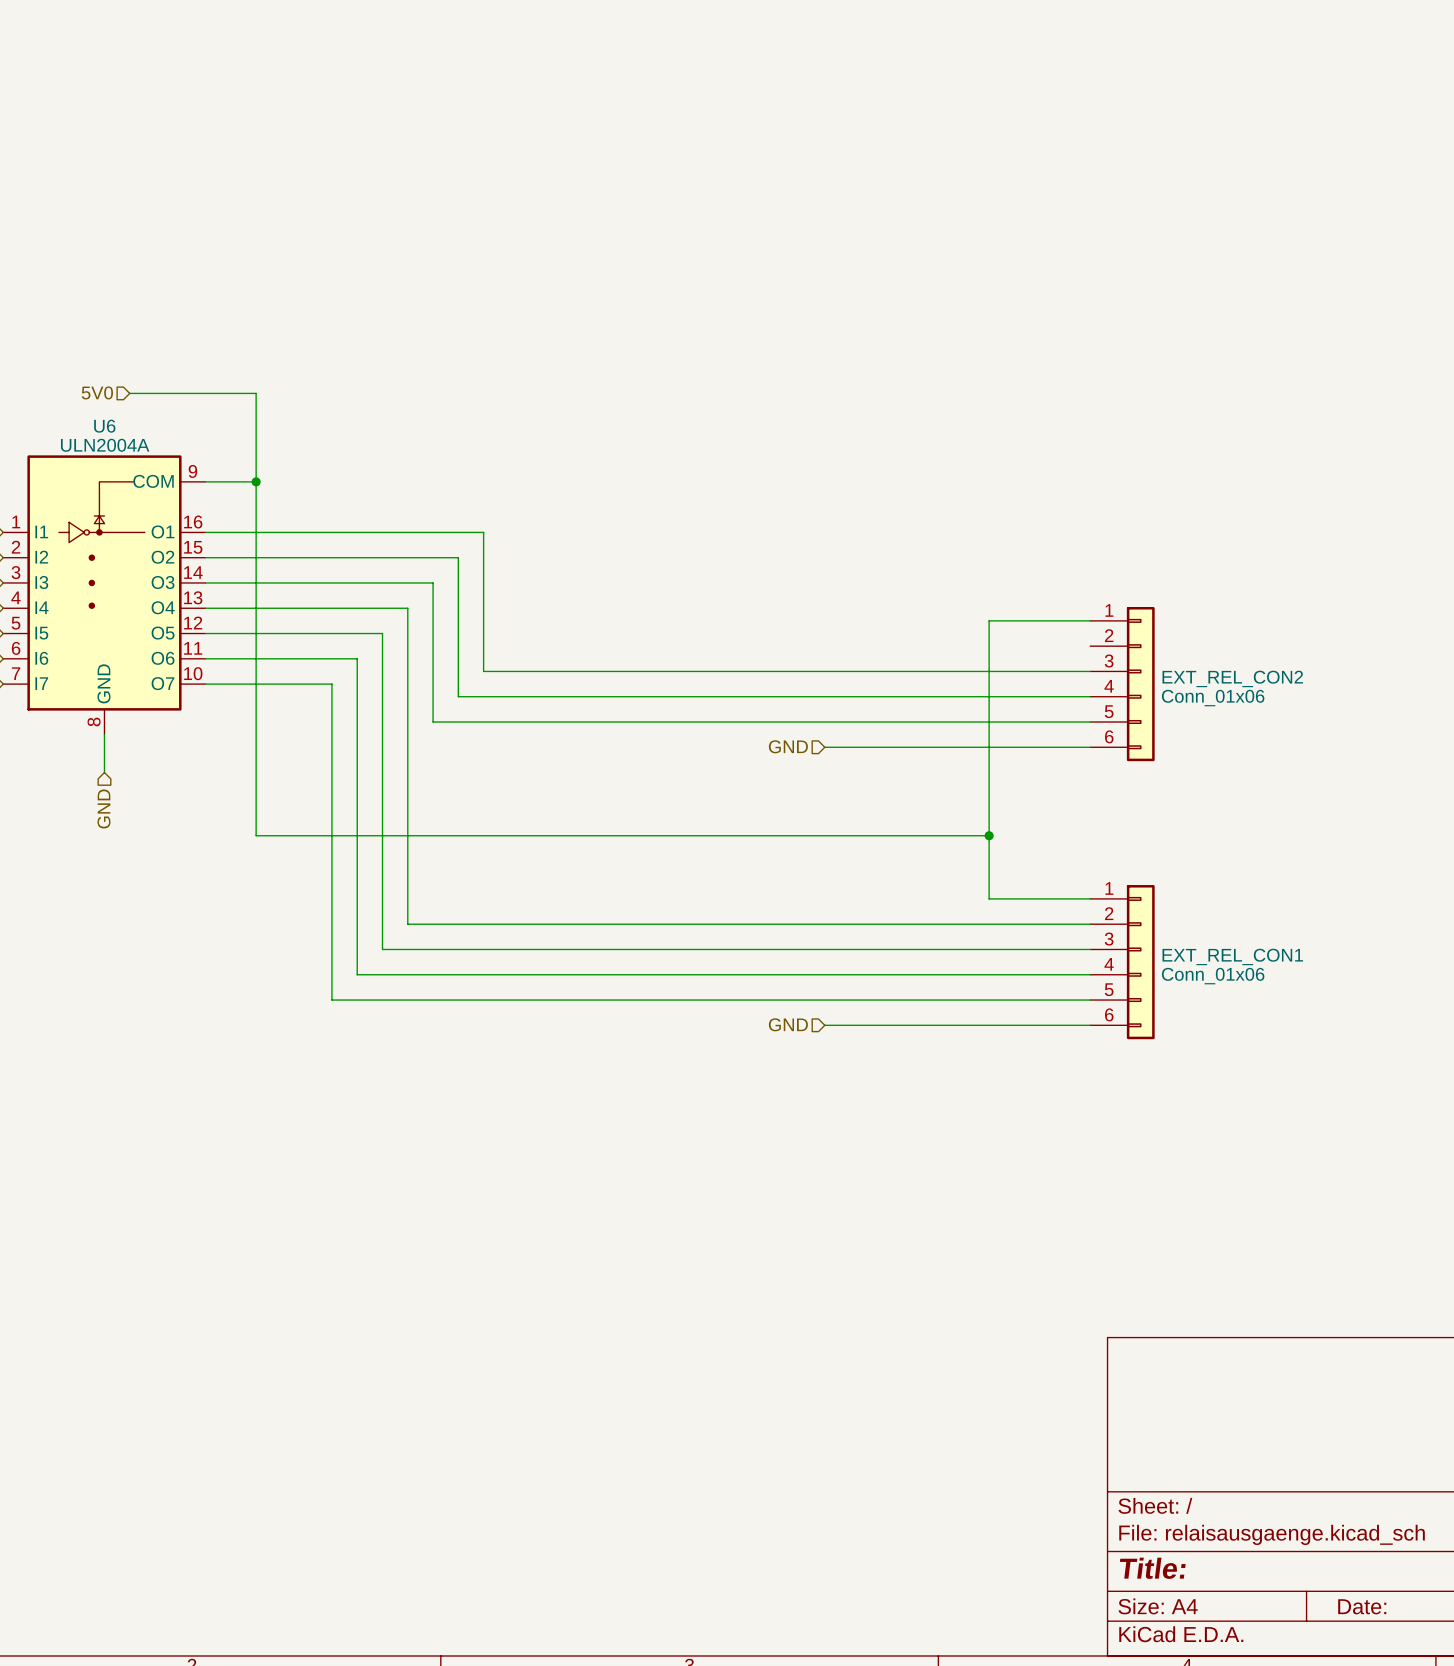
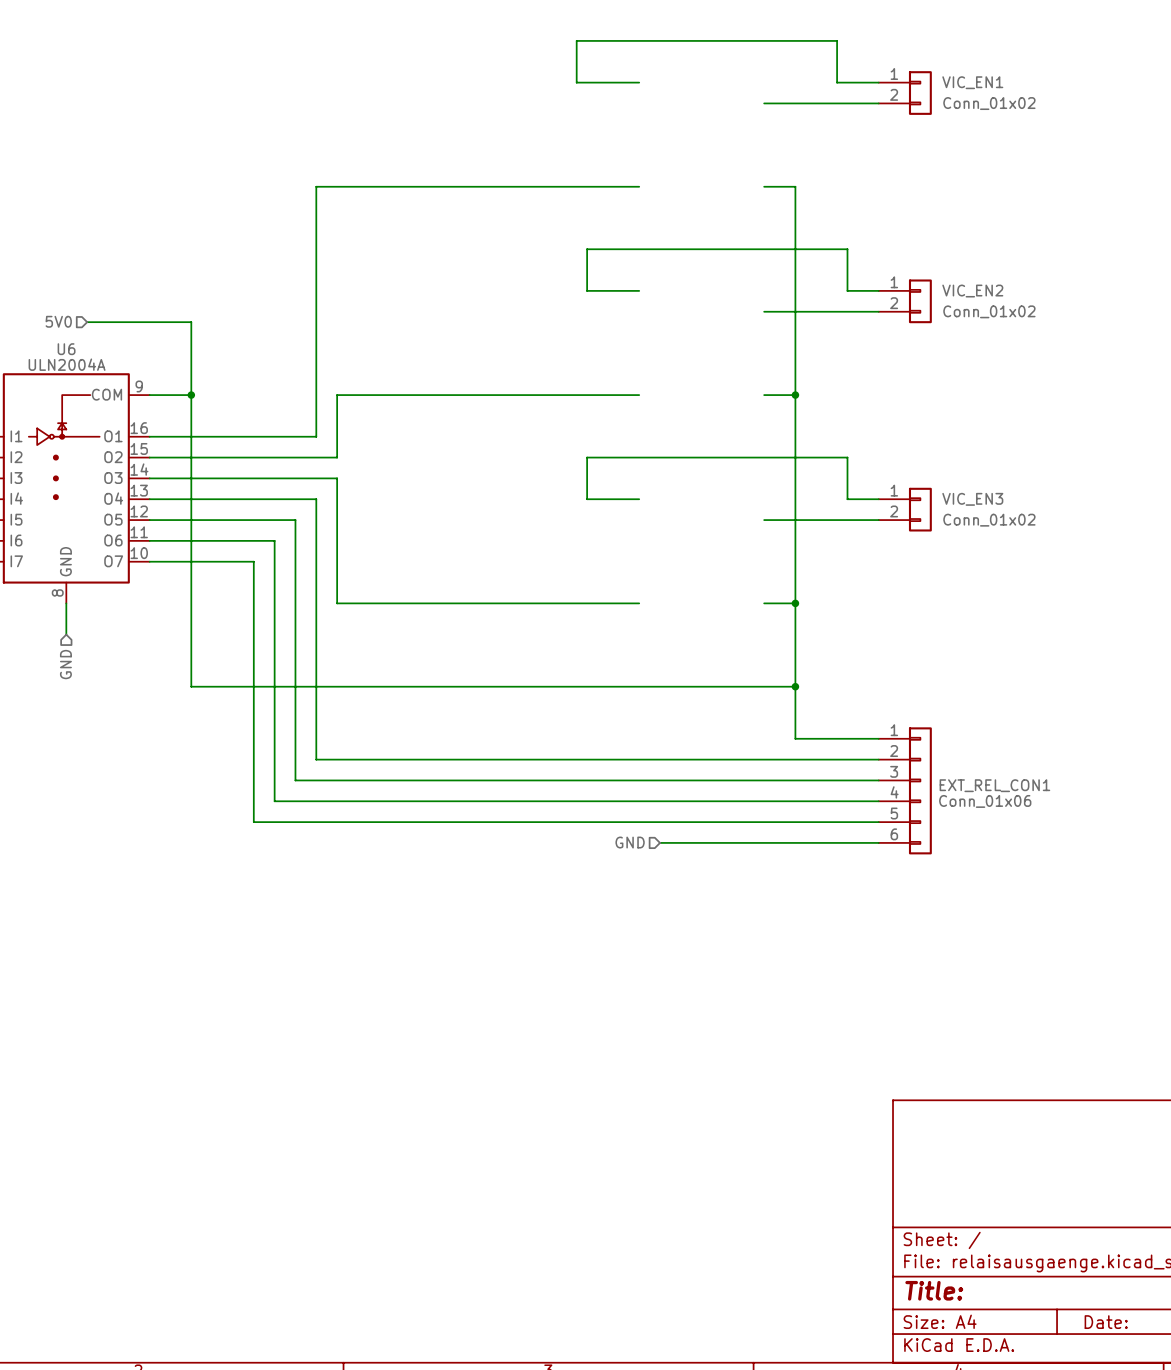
wire: none -> (639, 82) (576, 82) (576, 40) (837, 40) (837, 82) (878, 82)
VIC_EN1: none -> Conn_01x02 (905, 93)
wire: none -> (764, 103) (878, 103)
wire: none -> (639, 290) (587, 290) (587, 249) (847, 249) (847, 290) (878, 290)
VIC_EN2: none -> Conn_01x02 (905, 301)
wire: none -> (764, 311) (878, 311)
wire: none -> (764, 395) (795, 395)
junction: none -> (795, 395)
wire: (407, 532) (483, 532) (483, 671) (1090, 671) -> (316, 436) (316, 186) (639, 186)
wire: (433, 557) (458, 557) (458, 696) (1090, 696) -> (337, 457) (337, 395) (639, 395)
wire: none -> (639, 499) (587, 499) (587, 457) (847, 457) (847, 499) (878, 499)
wire: (989, 620) (1090, 620) -> (795, 509) (795, 186) (764, 186)
VIC_EN3: none -> Conn_01x02 (905, 509)
wire: none -> (764, 520) (878, 520)
EXT_REL_CON2: Conn_01x06 (1122, 684) -> none
wire: (433, 721) (1090, 721) -> (337, 592) (337, 603) (639, 603)
wire: none -> (764, 603) (795, 603)
junction: none -> (795, 603)
hierarchical label: GND (788, 746) -> none
wire: (824, 747) (1090, 747) -> none

